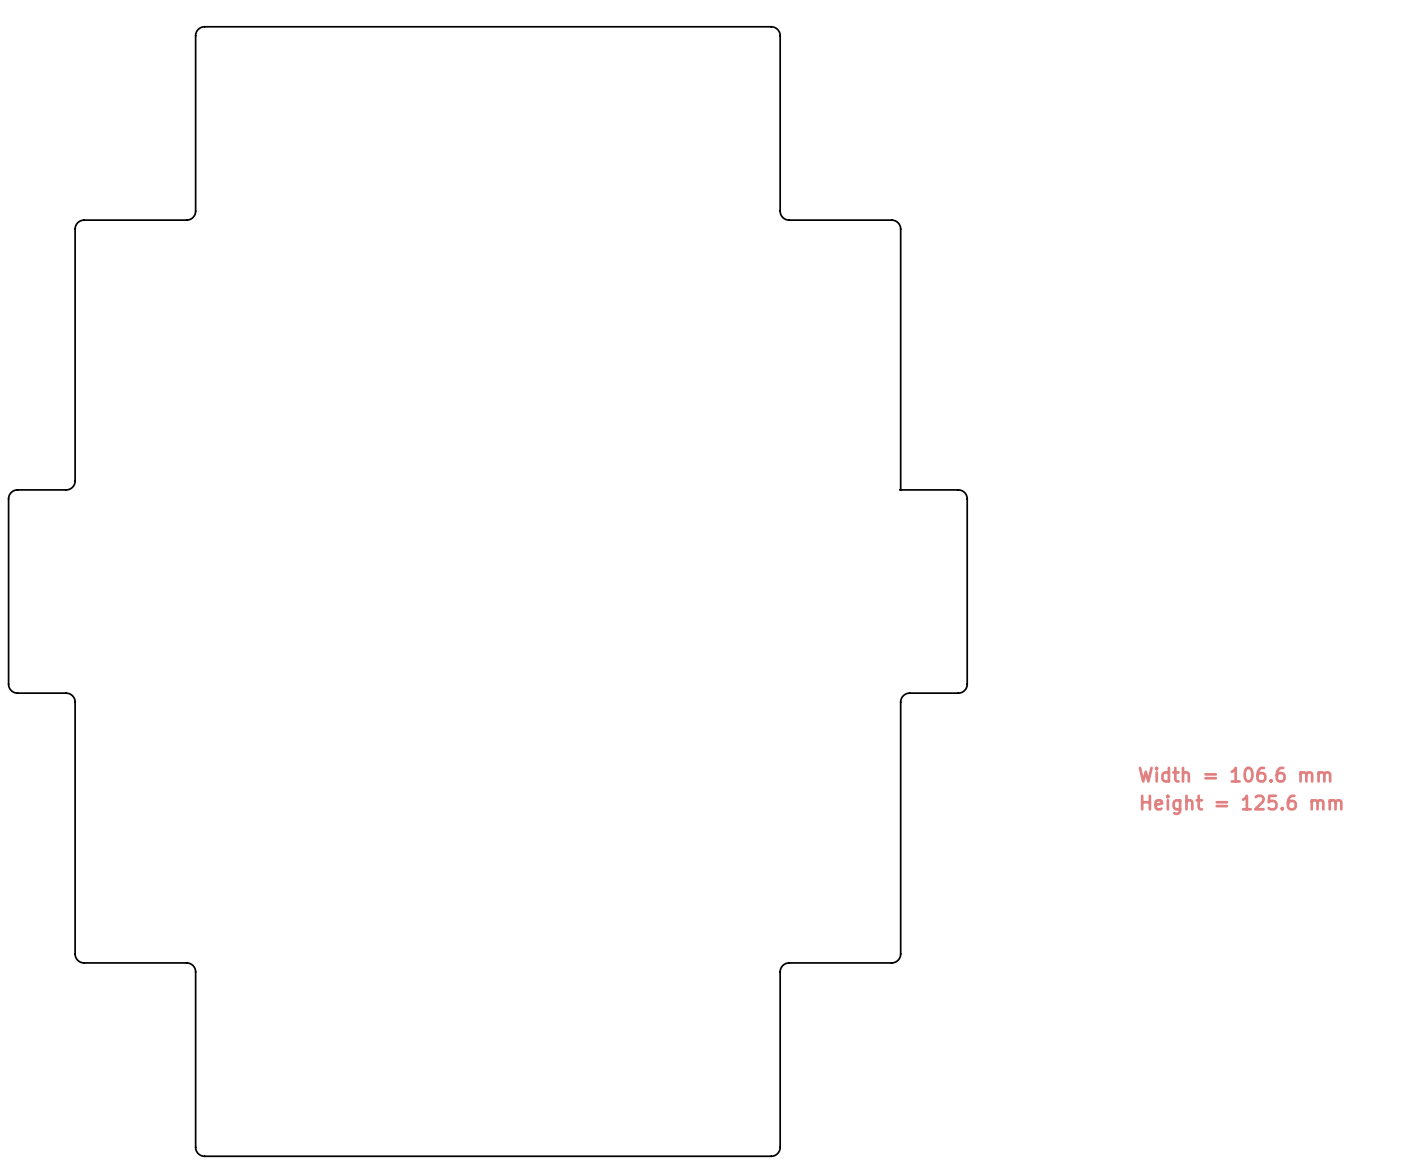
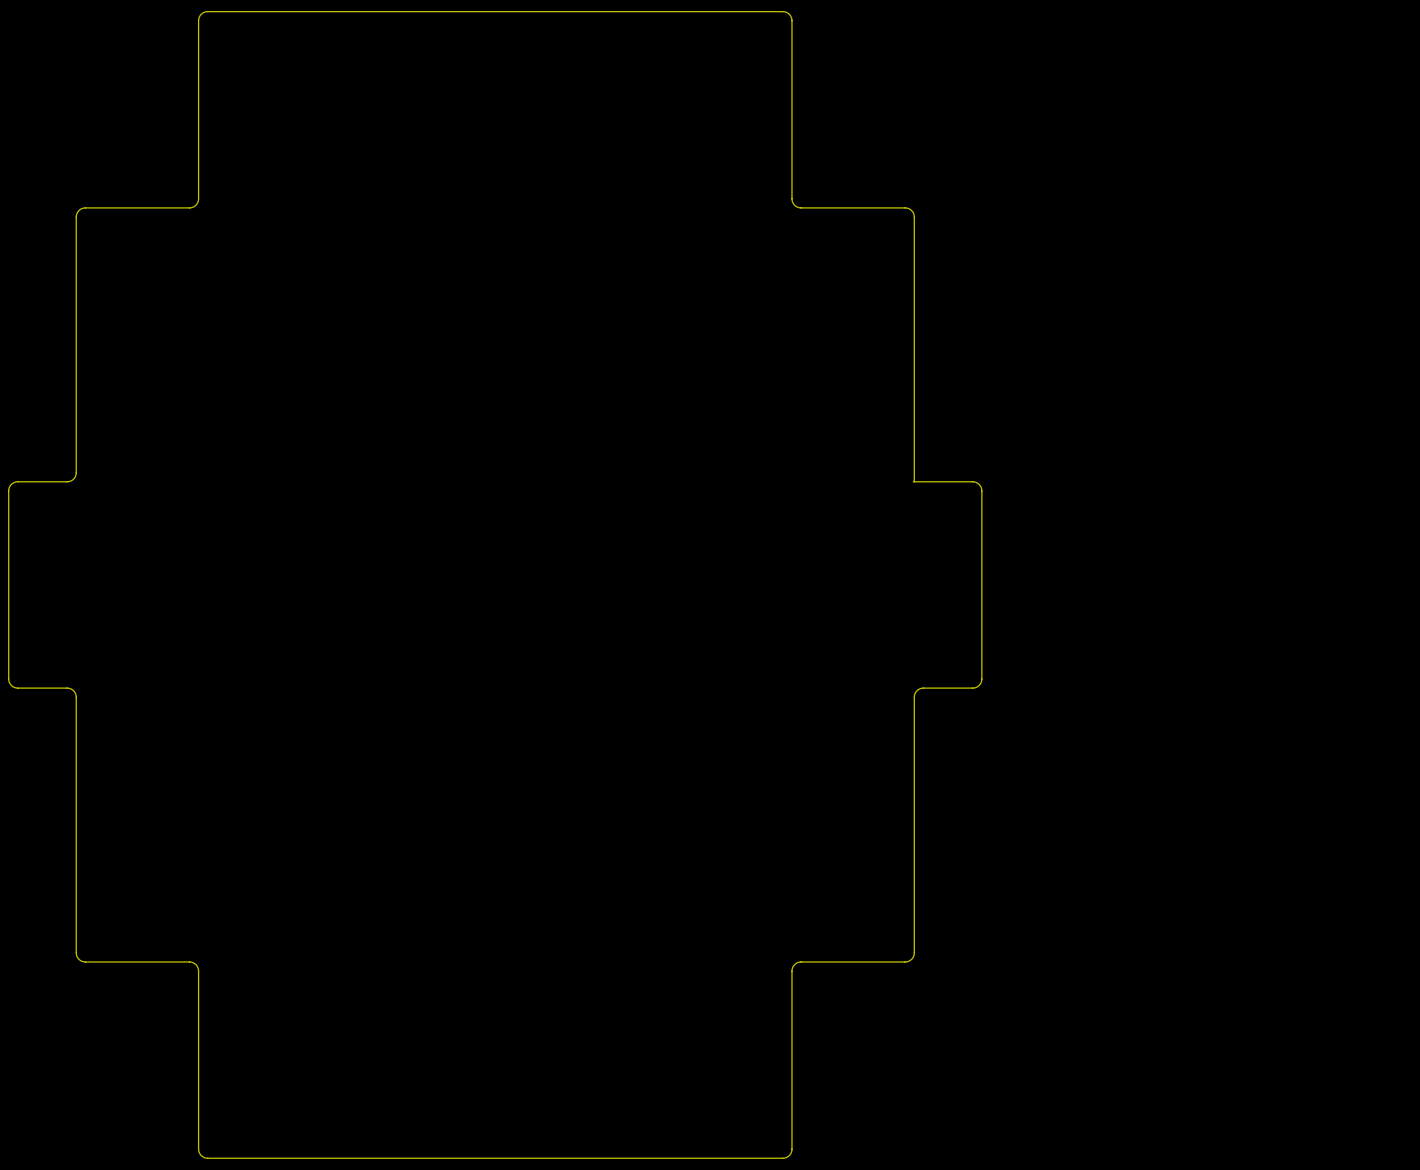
text: Width = 106.6 mm (1235, 774) -> none
text: Height = 125.6 mm (1241, 804) -> none

